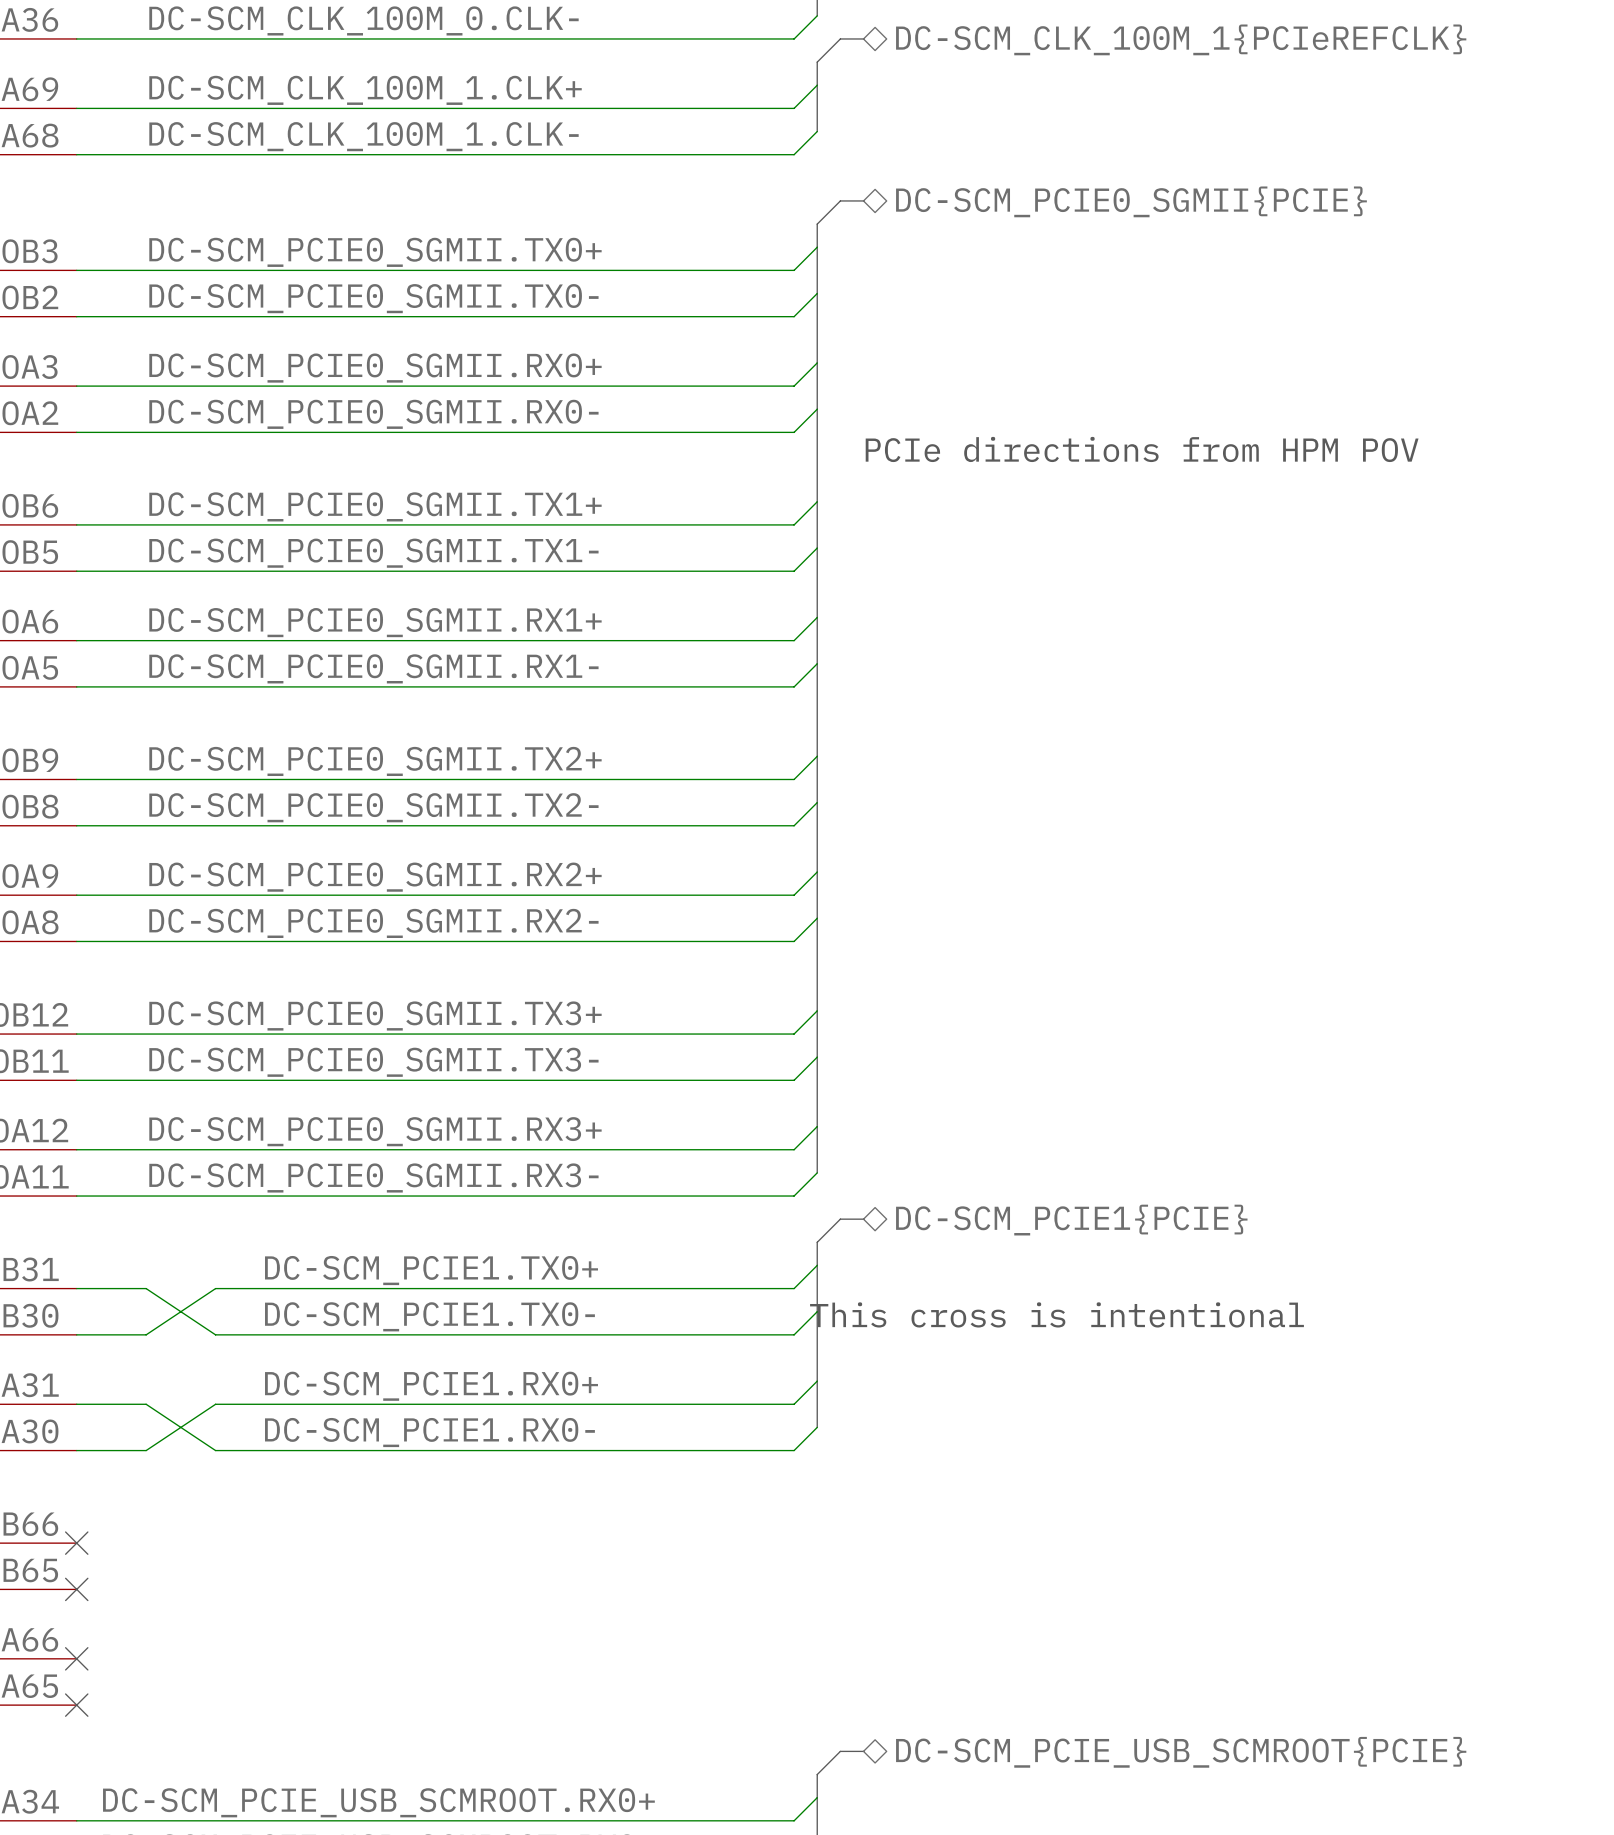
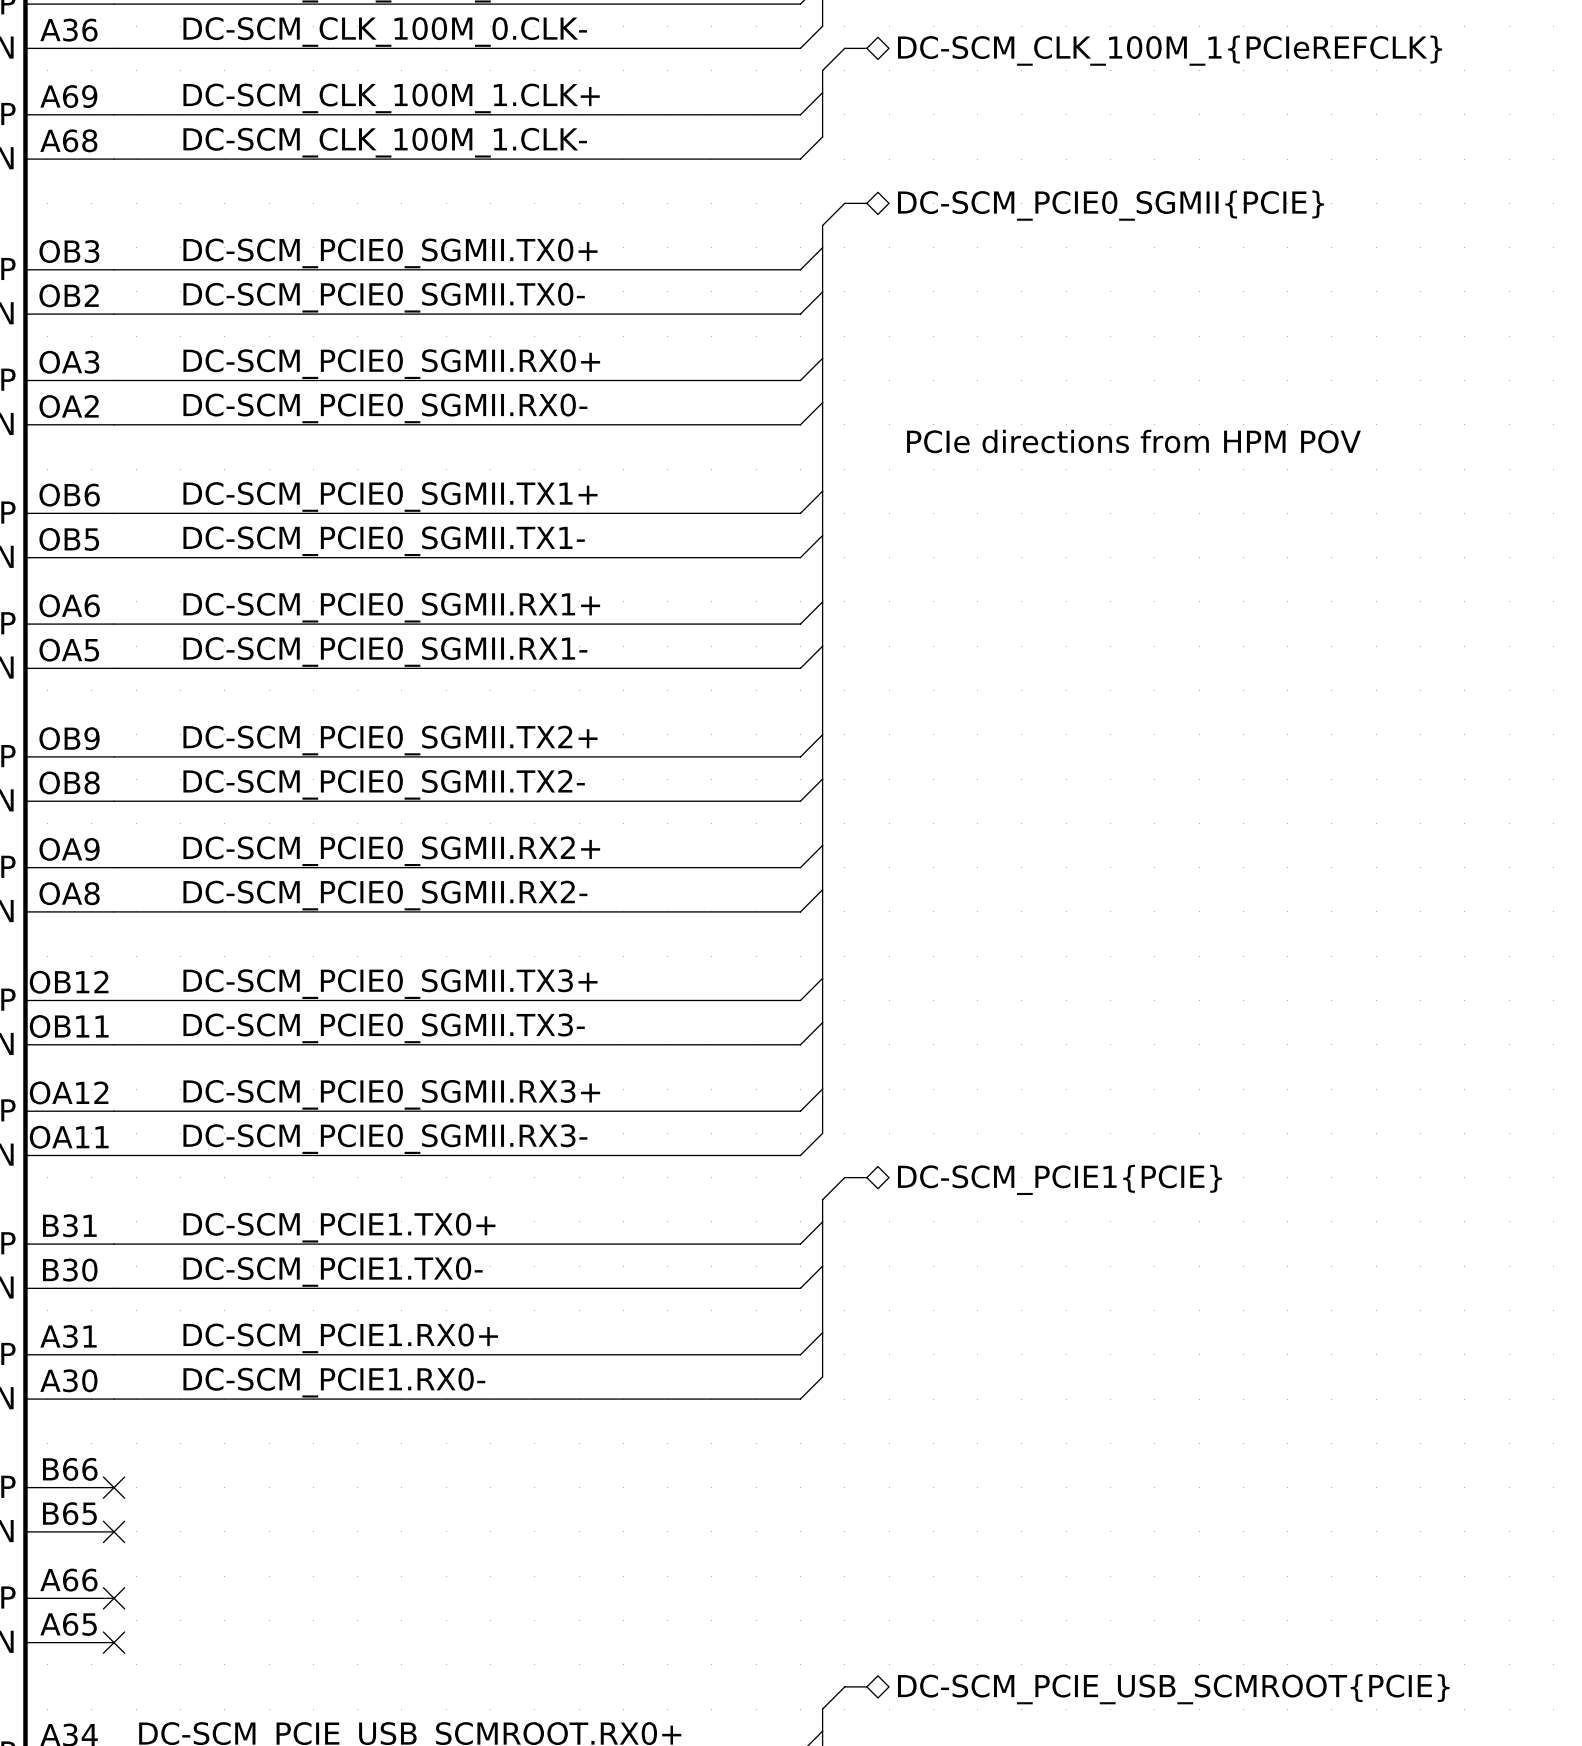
label position: DC-SCM_PCIE1.TX0+ (431, 1270) -> DC-SCM_PCIE1.TX0+ (339, 1227)
wire: (146, 1288) (215, 1334) -> (180, 1244) (246, 1244)
wire: (215, 1288) (146, 1334) -> (246, 1288) (180, 1288)
text: This cross is intentional (1057, 1314) -> none
label position: DC-SCM_PCIE1.TX0- (429, 1316) -> DC-SCM_PCIE1.TX0- (333, 1271)
label position: DC-SCM_PCIE1.RX0+ (431, 1386) -> DC-SCM_PCIE1.RX0+ (340, 1338)
wire: (146, 1404) (215, 1450) -> (180, 1354) (246, 1354)
wire: (215, 1404) (146, 1450) -> (246, 1399) (180, 1399)
label position: DC-SCM_PCIE1.RX0- (429, 1432) -> DC-SCM_PCIE1.RX0- (334, 1382)

